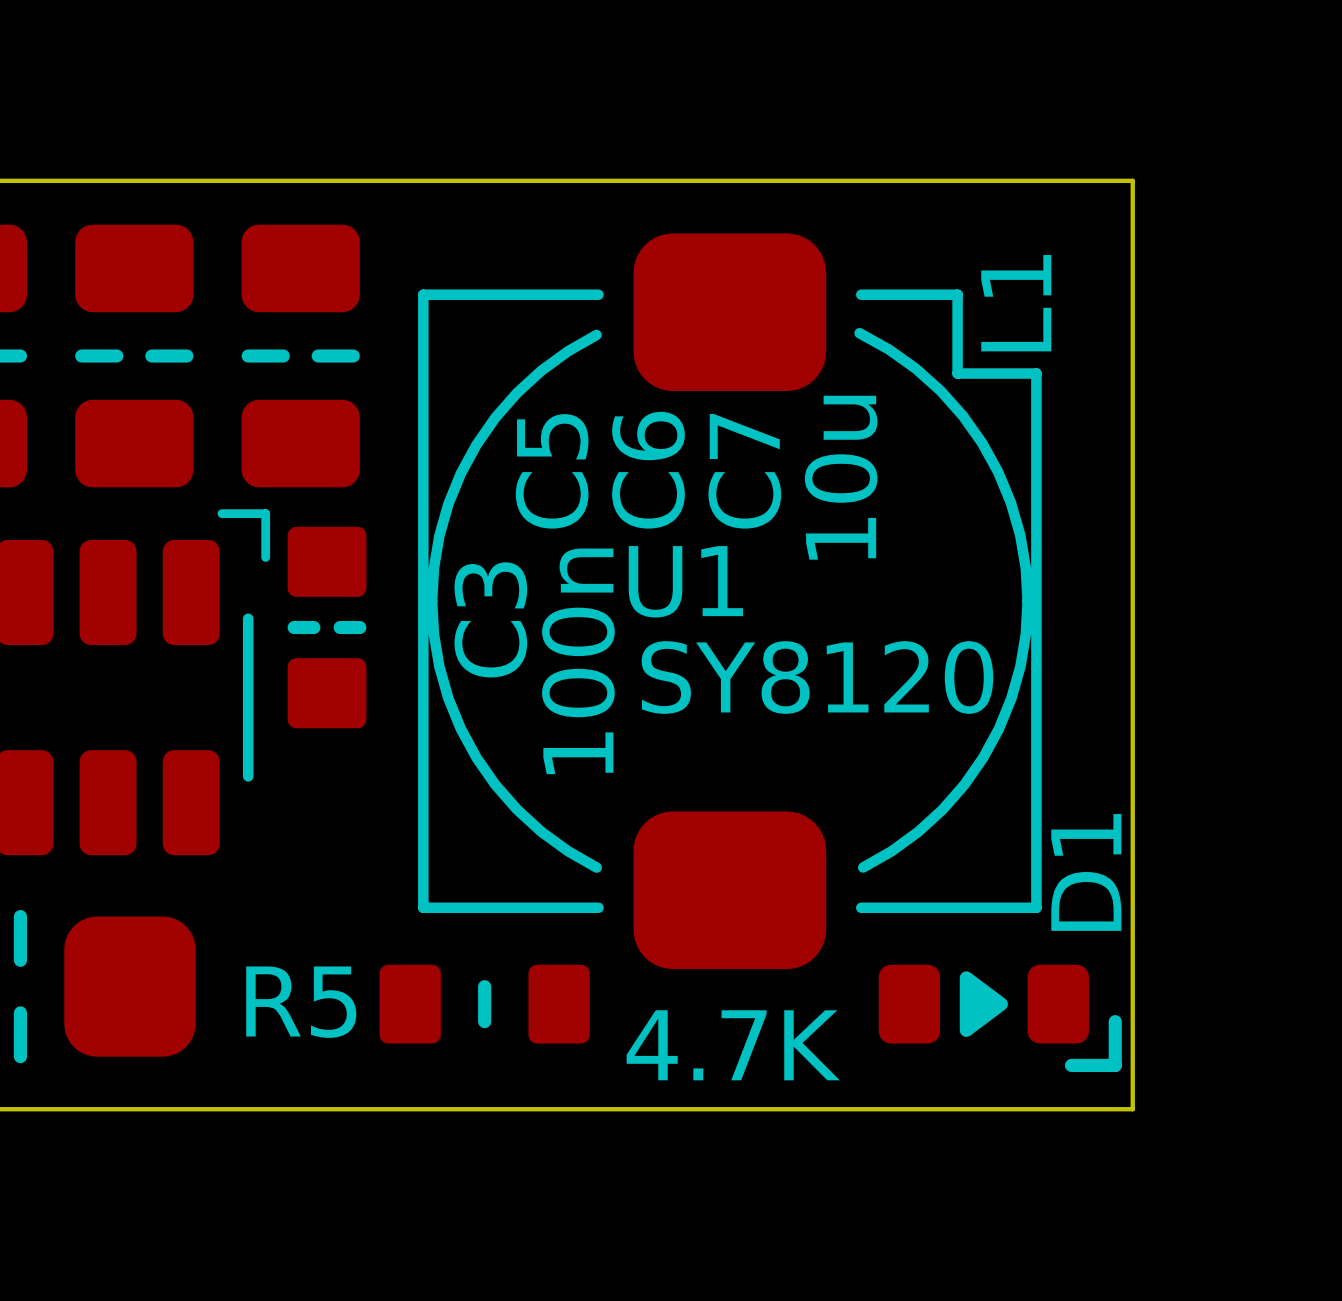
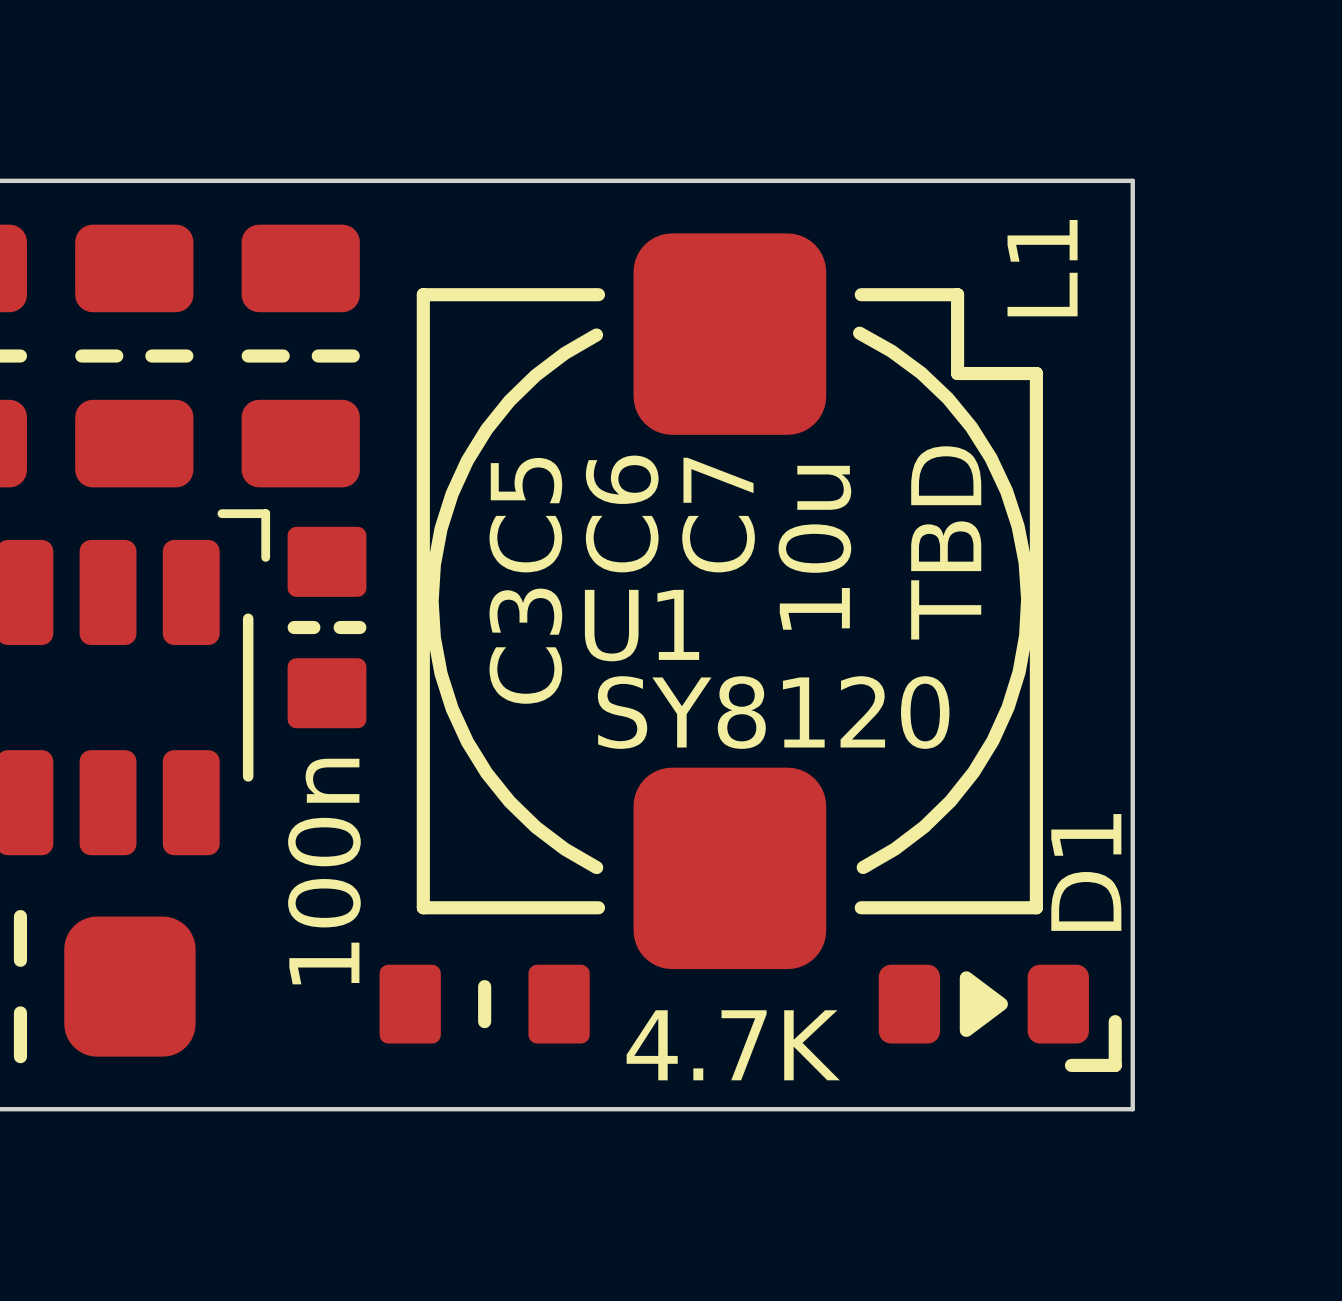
L1 footprint: [418, 233, 1042, 970] -> [416, 233, 1043, 970]
L1 name position: L1 (1016, 303) -> L1 (1042, 268)
C6 name position: C6 (648, 470) -> C6 (622, 513)
C5 name position: C5 (552, 471) -> C5 (525, 515)
C7 name position: C7 (744, 471) -> C7 (718, 515)
C5 value position: 10u (841, 477) -> 10u (814, 547)
L1 value: none -> TBD (946, 542)
U1 name position: U1 (685, 581) -> U1 (642, 625)
C3 name position: C3 (490, 619) -> C3 (525, 646)
C3 value position: 100n (578, 661) -> 100n (324, 871)
U1 value position: SY8120 (817, 677) -> SY8120 (773, 712)
R5 name: R5 (301, 1002) -> none

